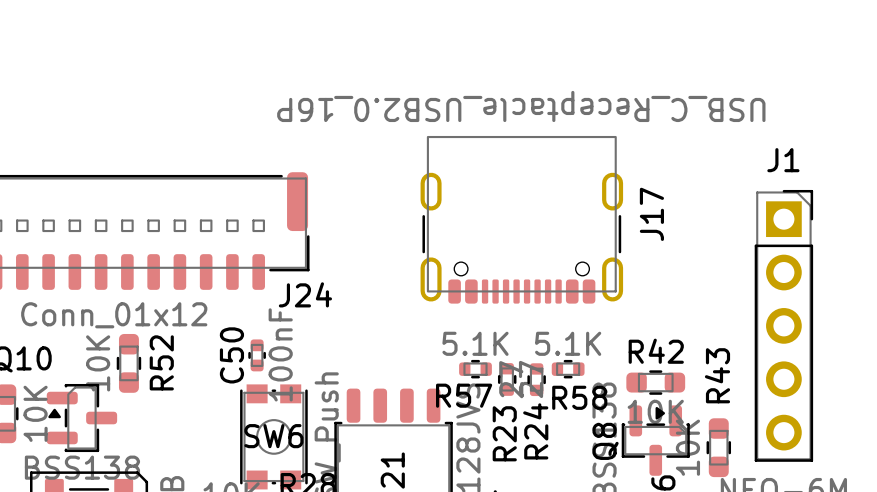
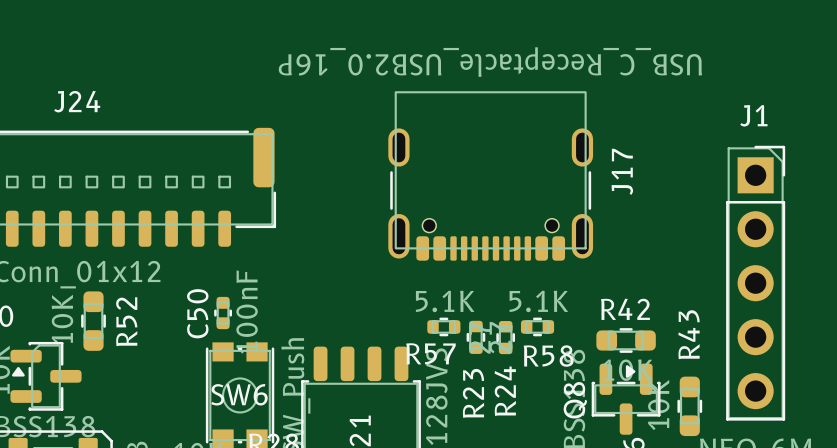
J24 name position: J24 (305, 294) -> J24 (77, 101)

